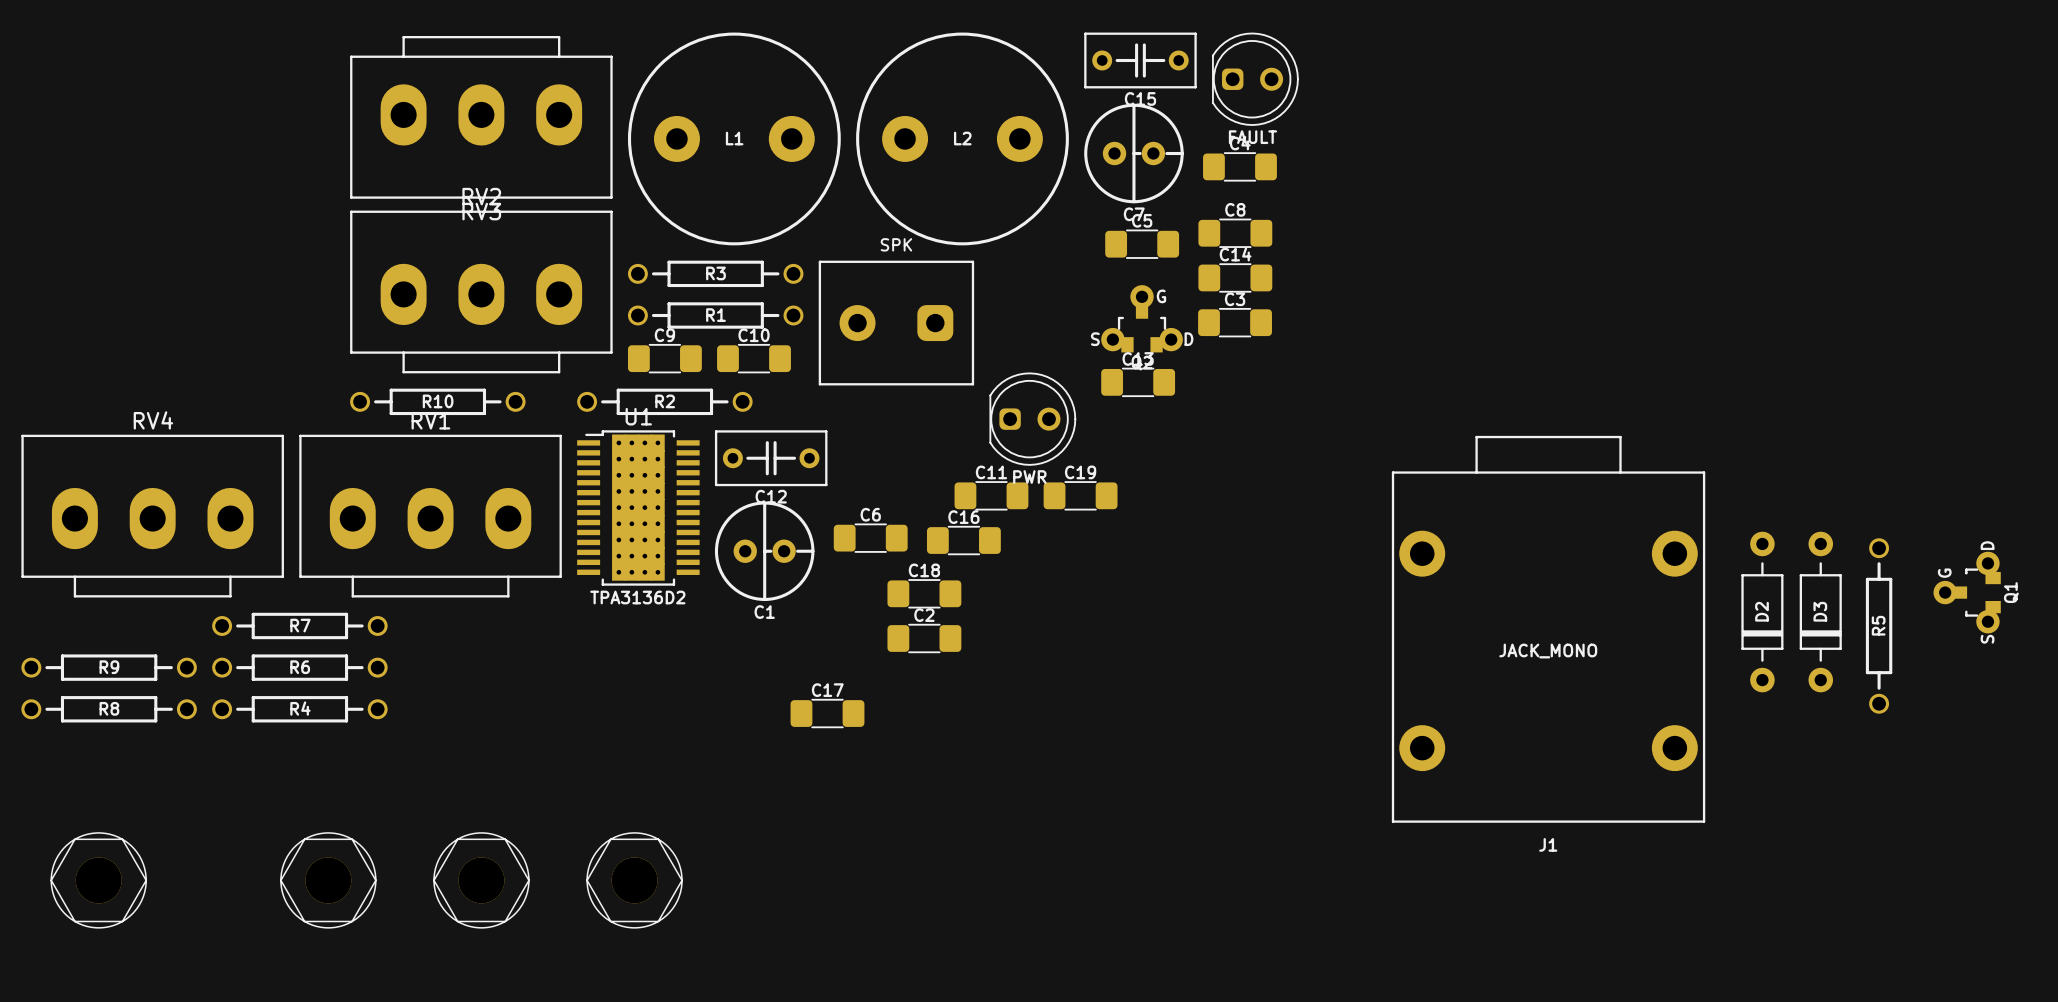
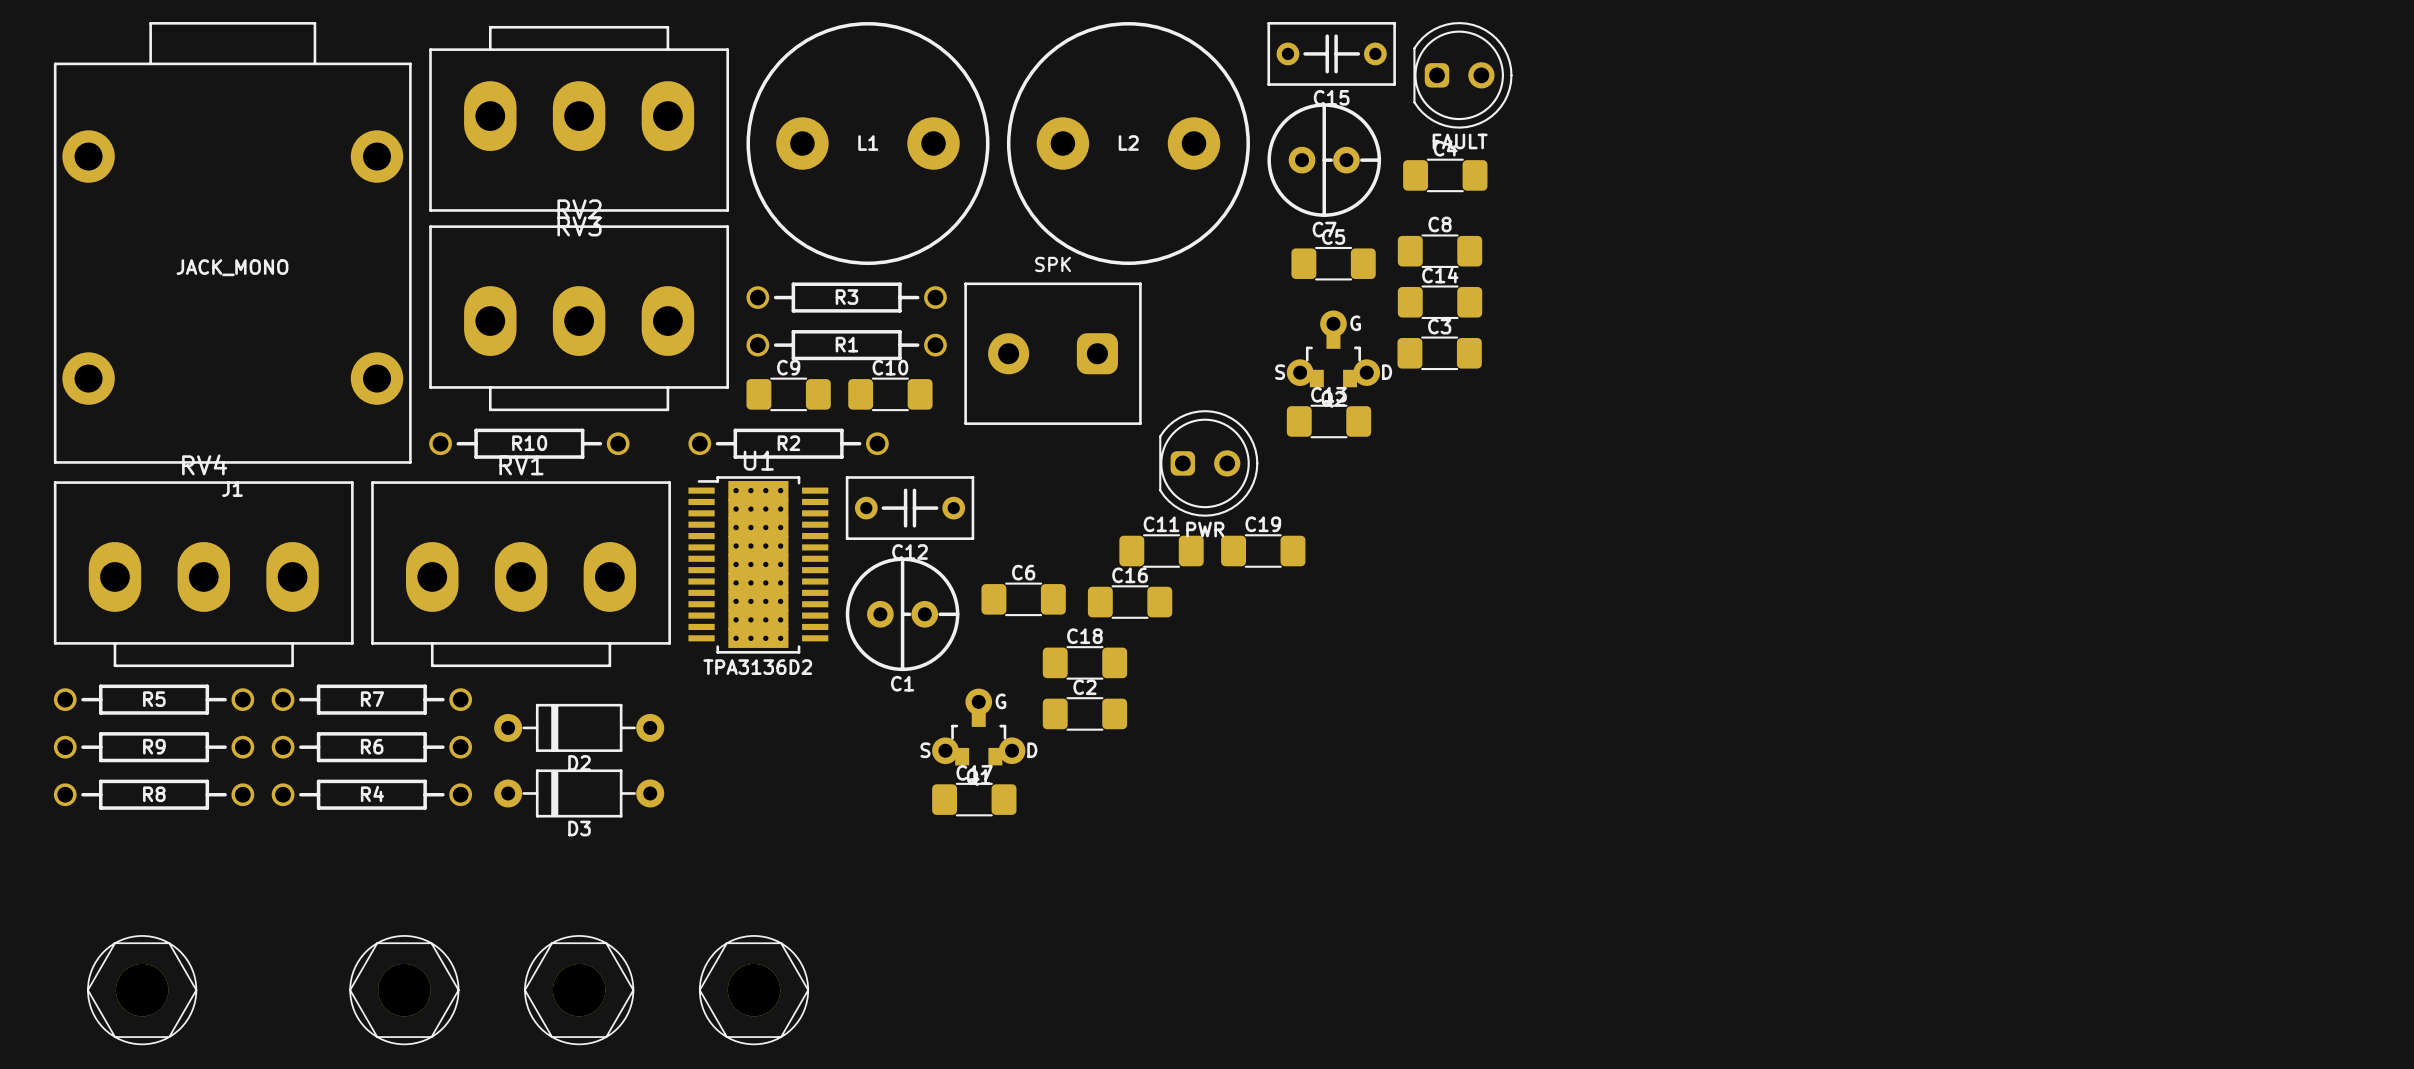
D2 footprint: [1741, 531, 1784, 693] -> [494, 703, 665, 752]
D3 footprint: [1799, 531, 1842, 693] -> [494, 769, 665, 818]
Q1 rotation: 0° (1967, 592) -> 90° clockwise (978, 726)
Q1 position: (1967, 592) -> (978, 726)
D2 name position: D2 (1761, 611) -> D2 (579, 762)
D3 name position: D3 (1820, 611) -> D3 (579, 828)
R5 rotation: 0° (1879, 625) -> 90° clockwise (154, 699)
R5 position: (1879, 625) -> (154, 699)
J1 position: (1548, 629) -> (232, 242)

